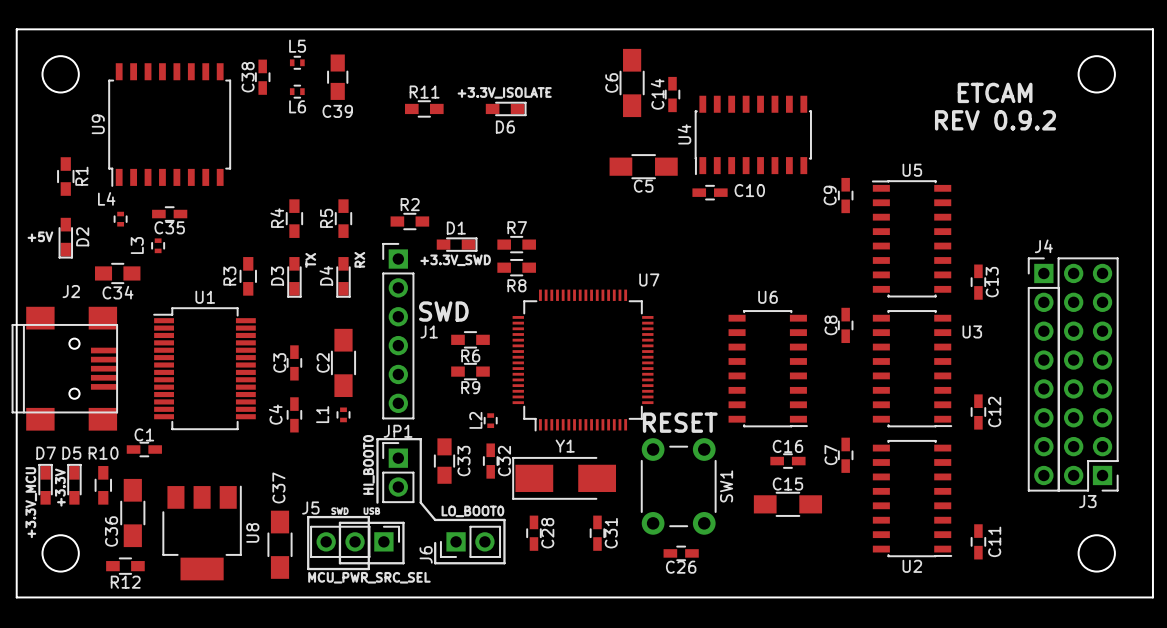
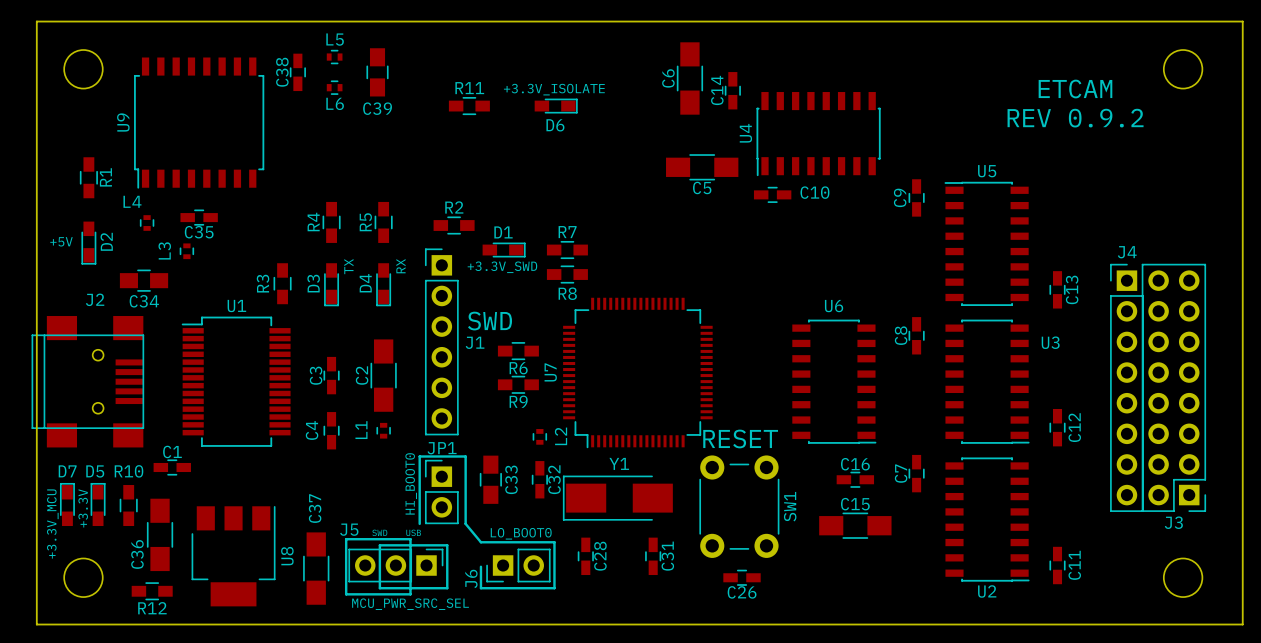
U7 name rotation: 0° (649, 279) -> 90° counterclockwise (550, 372)
U7 name position: U7 (649, 279) -> U7 (550, 372)
L2 name position: L2 (475, 420) -> L2 (561, 436)

